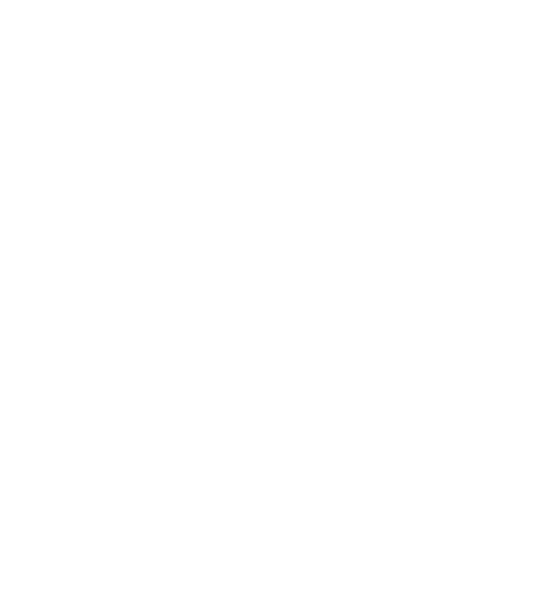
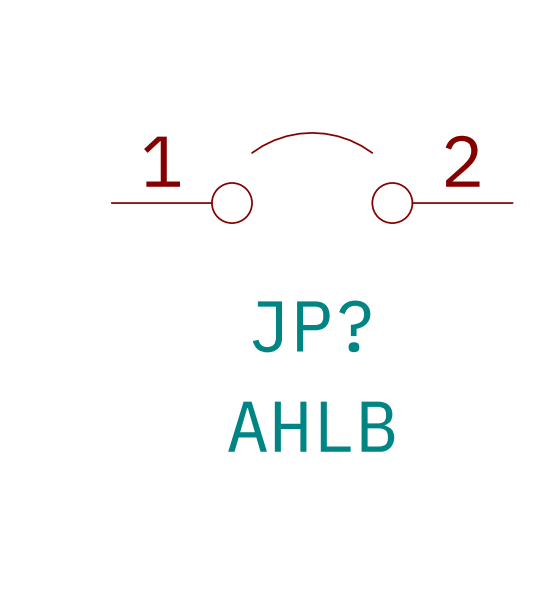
JP?: none -> AHLB (312, 177)

